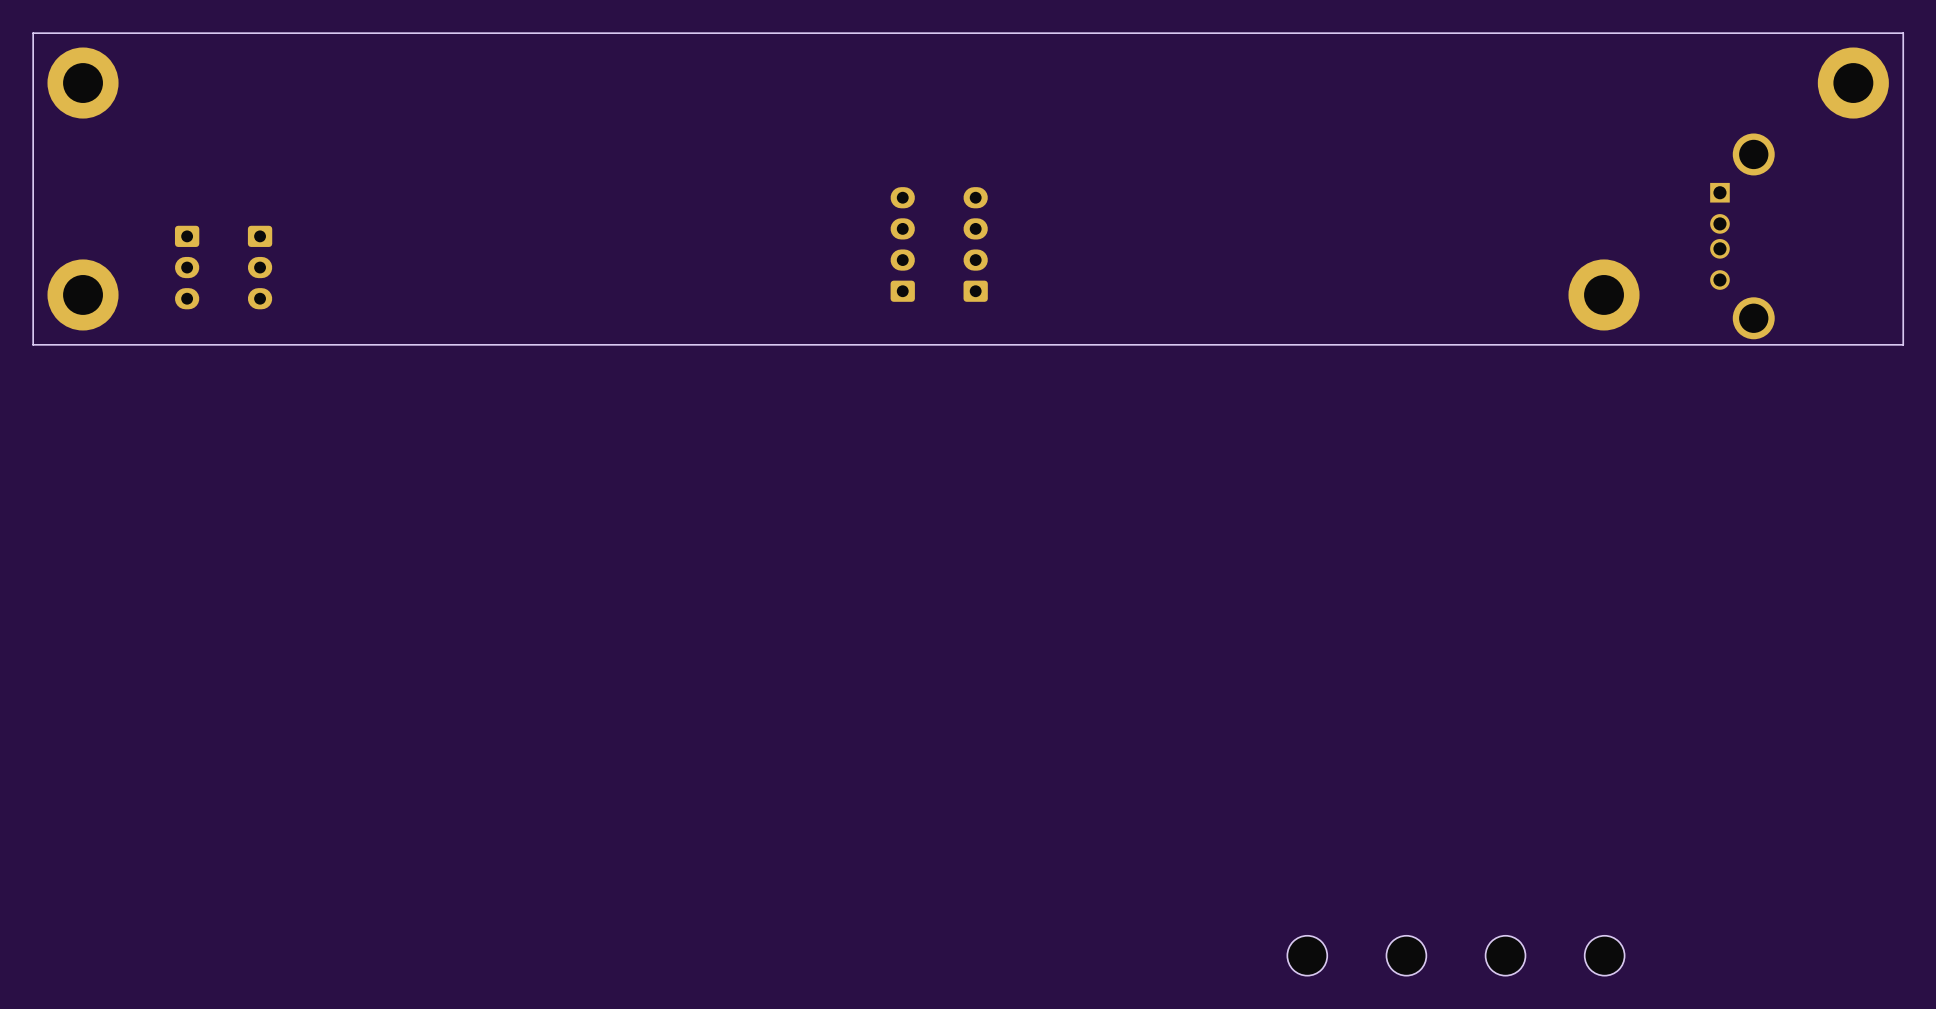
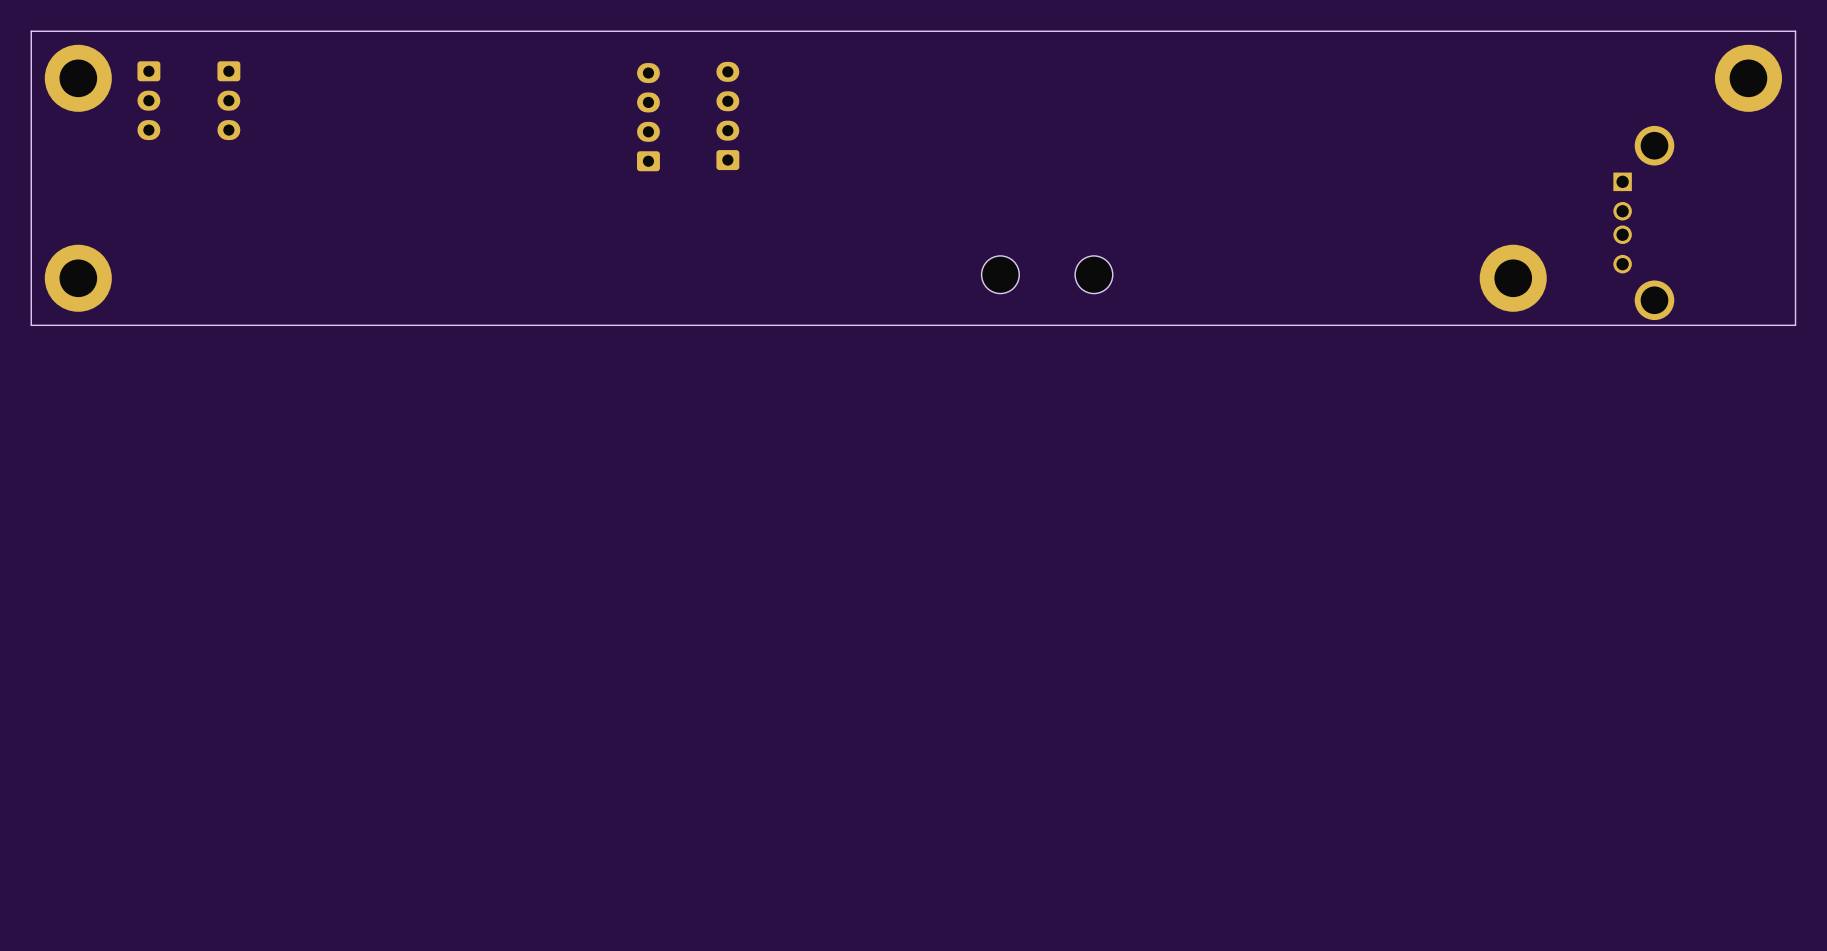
part: none -> (148, 100)
part: none -> (228, 100)
part: none -> (727, 115)
part: none -> (648, 117)
part: (902, 244) -> none
part: (975, 244) -> none
part: (187, 267) -> none
part: (260, 267) -> none
part: none -> (1000, 274)
part: none -> (1093, 274)
part: (1307, 955) -> none
part: (1406, 955) -> none
part: (1505, 955) -> none
part: (1604, 955) -> none

